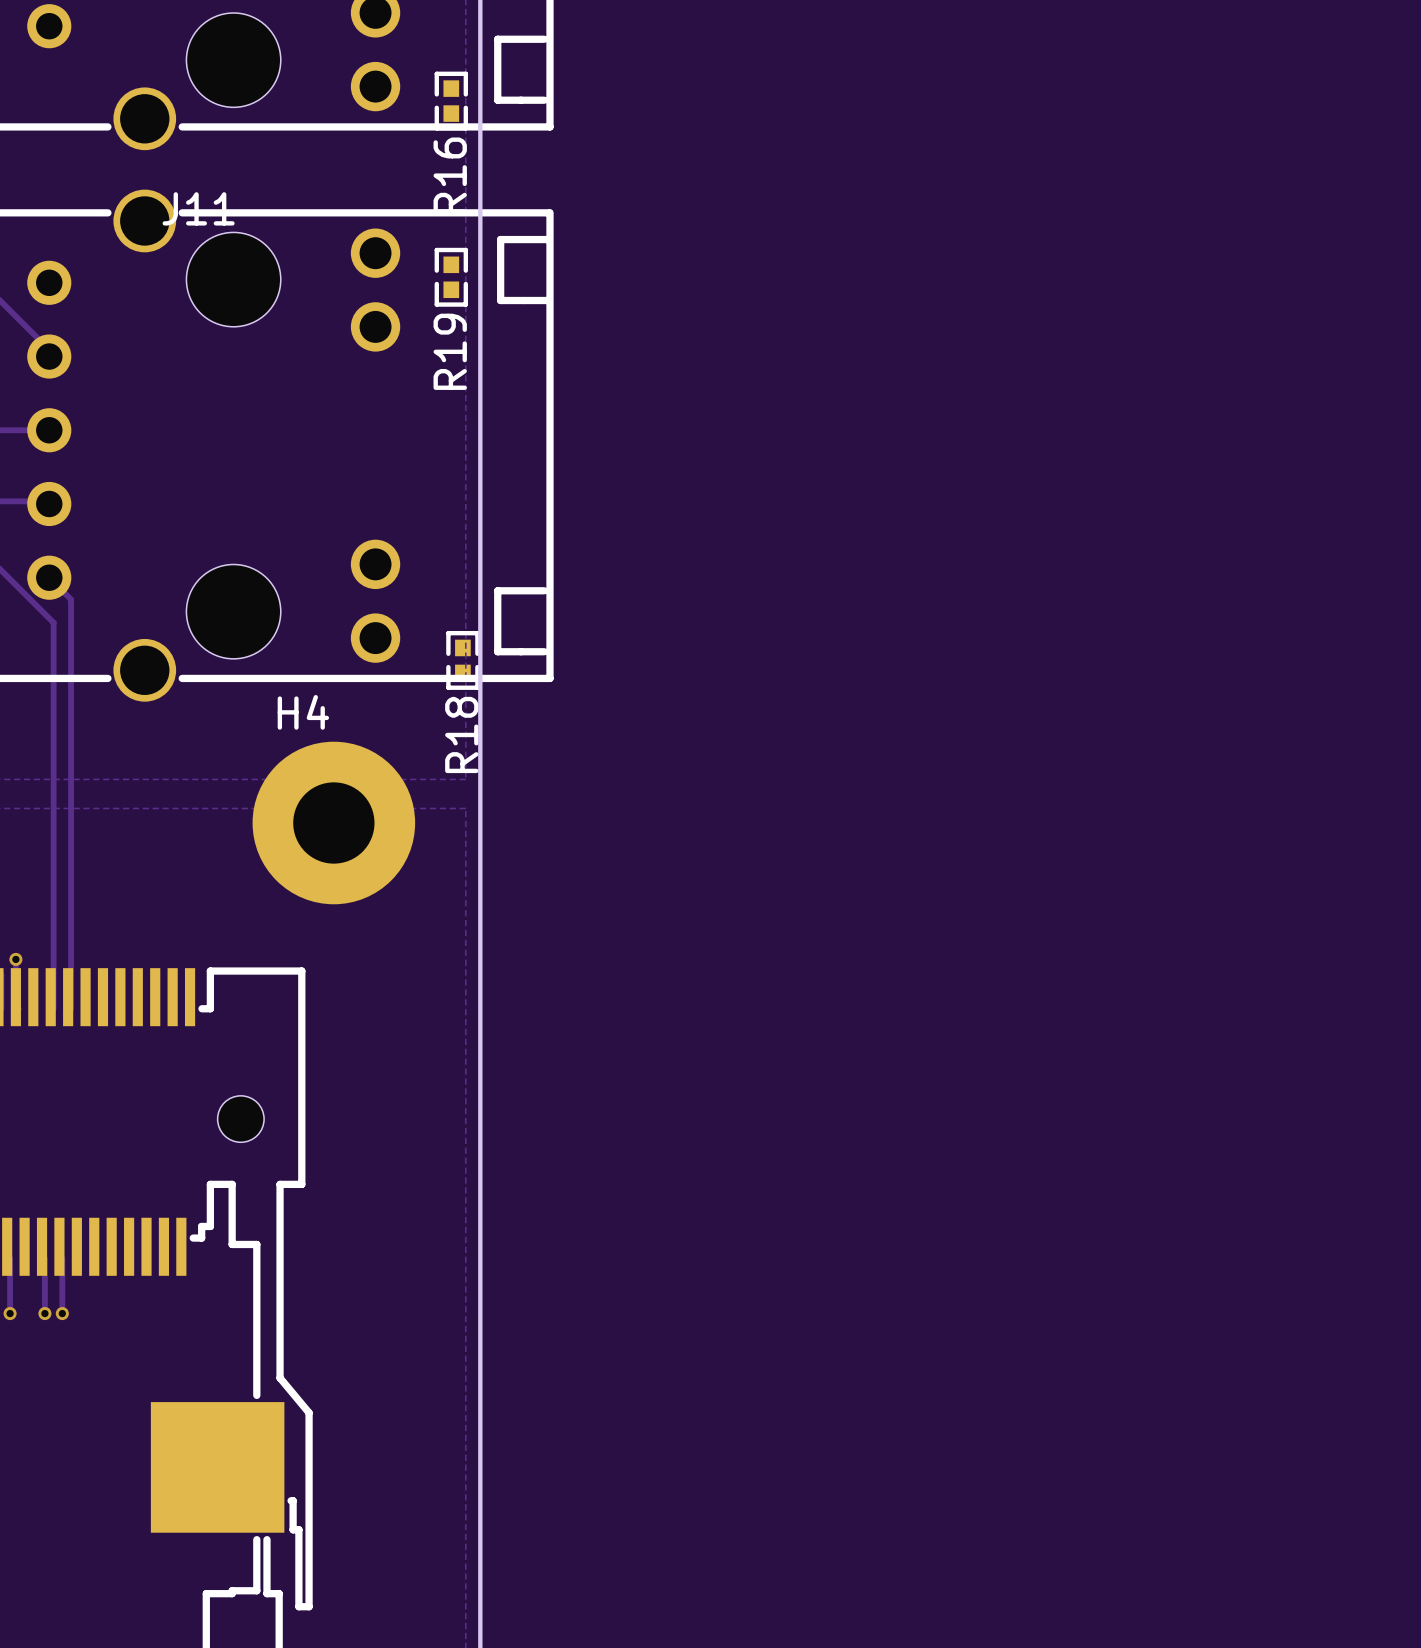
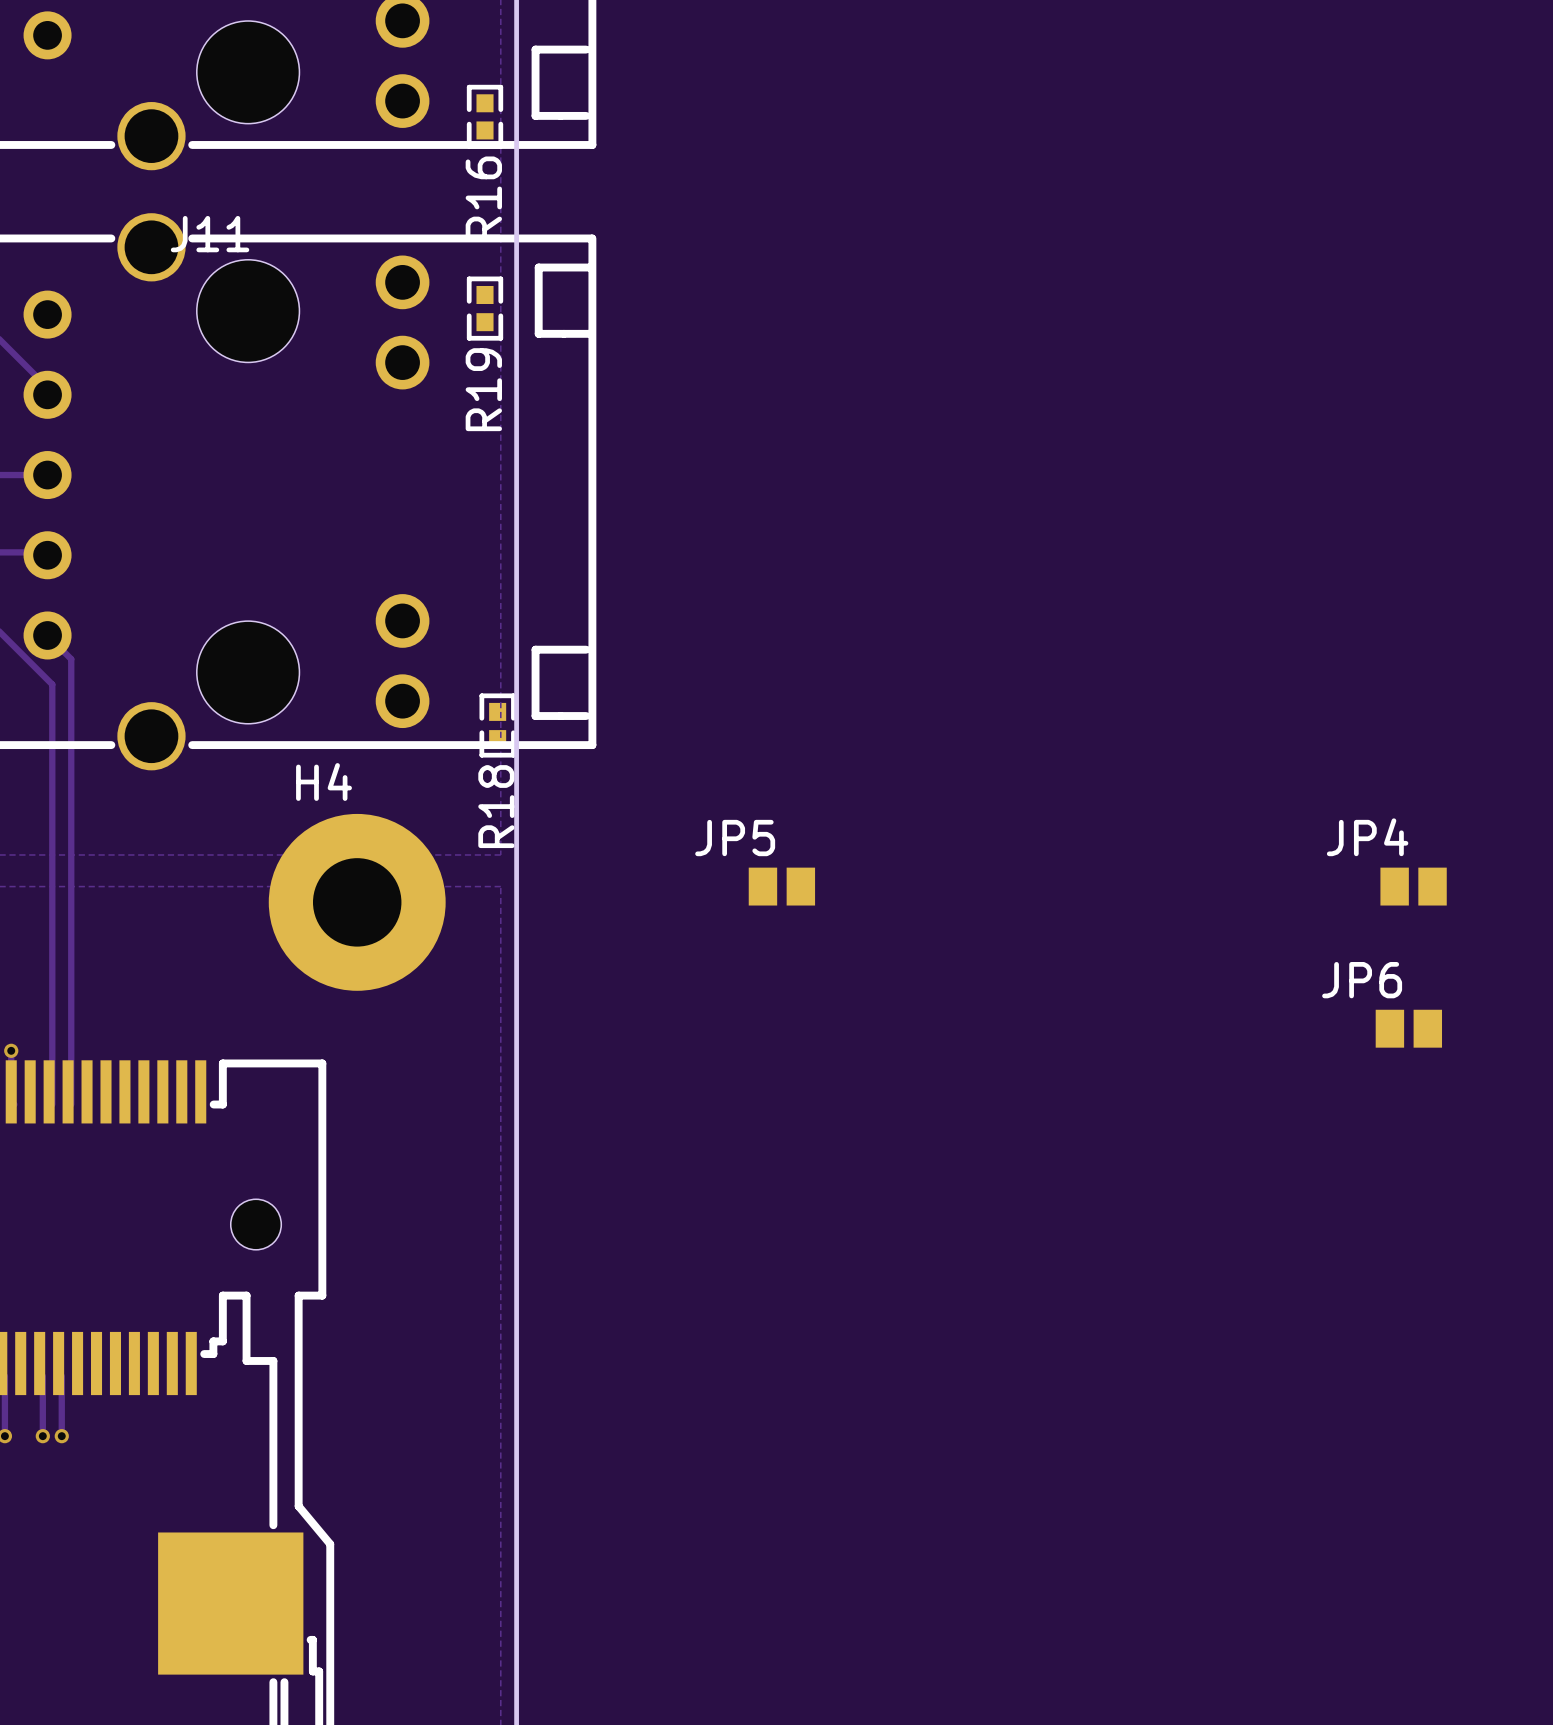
JP5: none -> (781, 886)
JP4: none -> (1413, 886)
JP6: none -> (1408, 1028)

